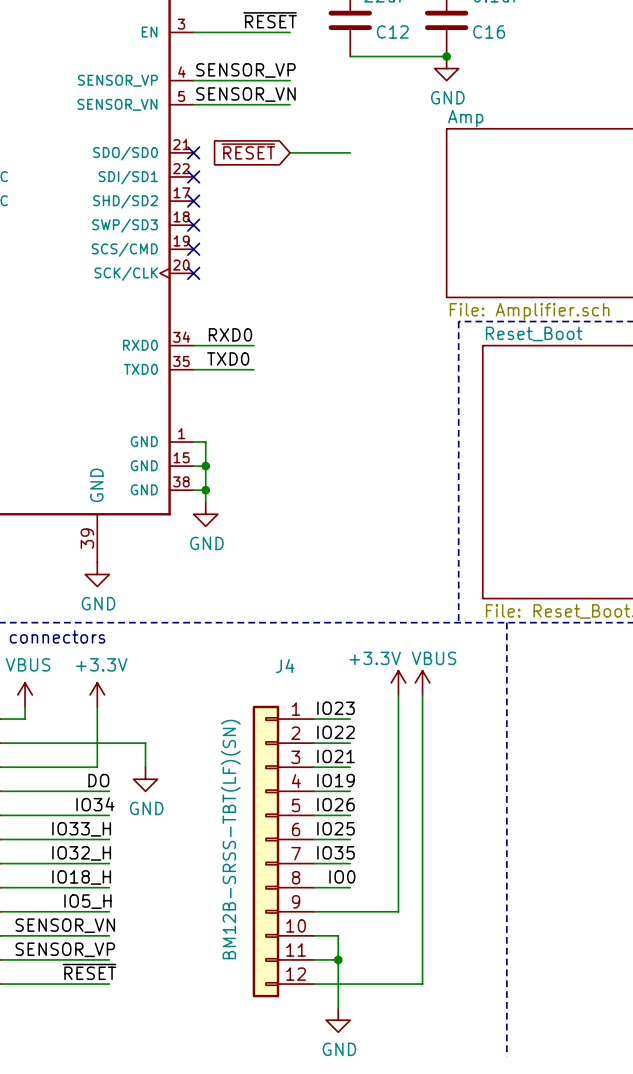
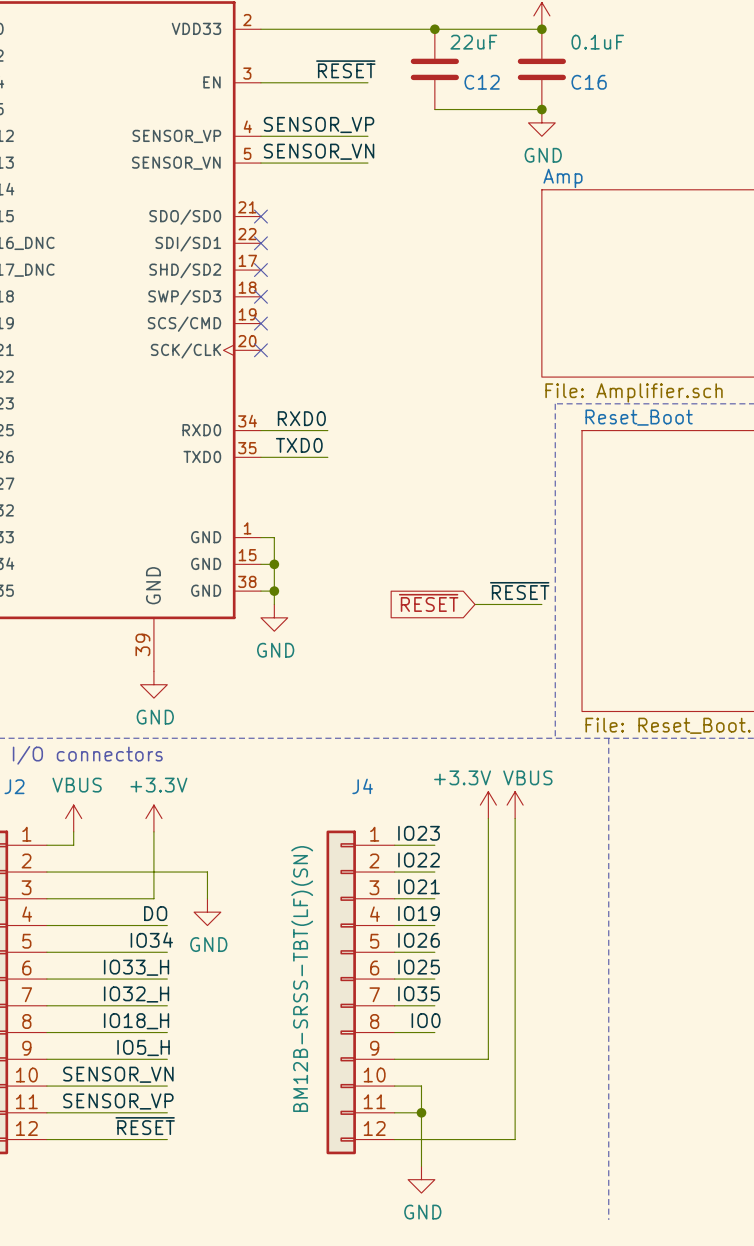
global label: ~{RESET} (248, 151) -> none
wire: (290, 152) (350, 152) -> none
label: none -> ~{RESET} (519, 591)
global label: none -> ~{RESET} (428, 602)
wire: none -> (474, 604) (541, 604)

